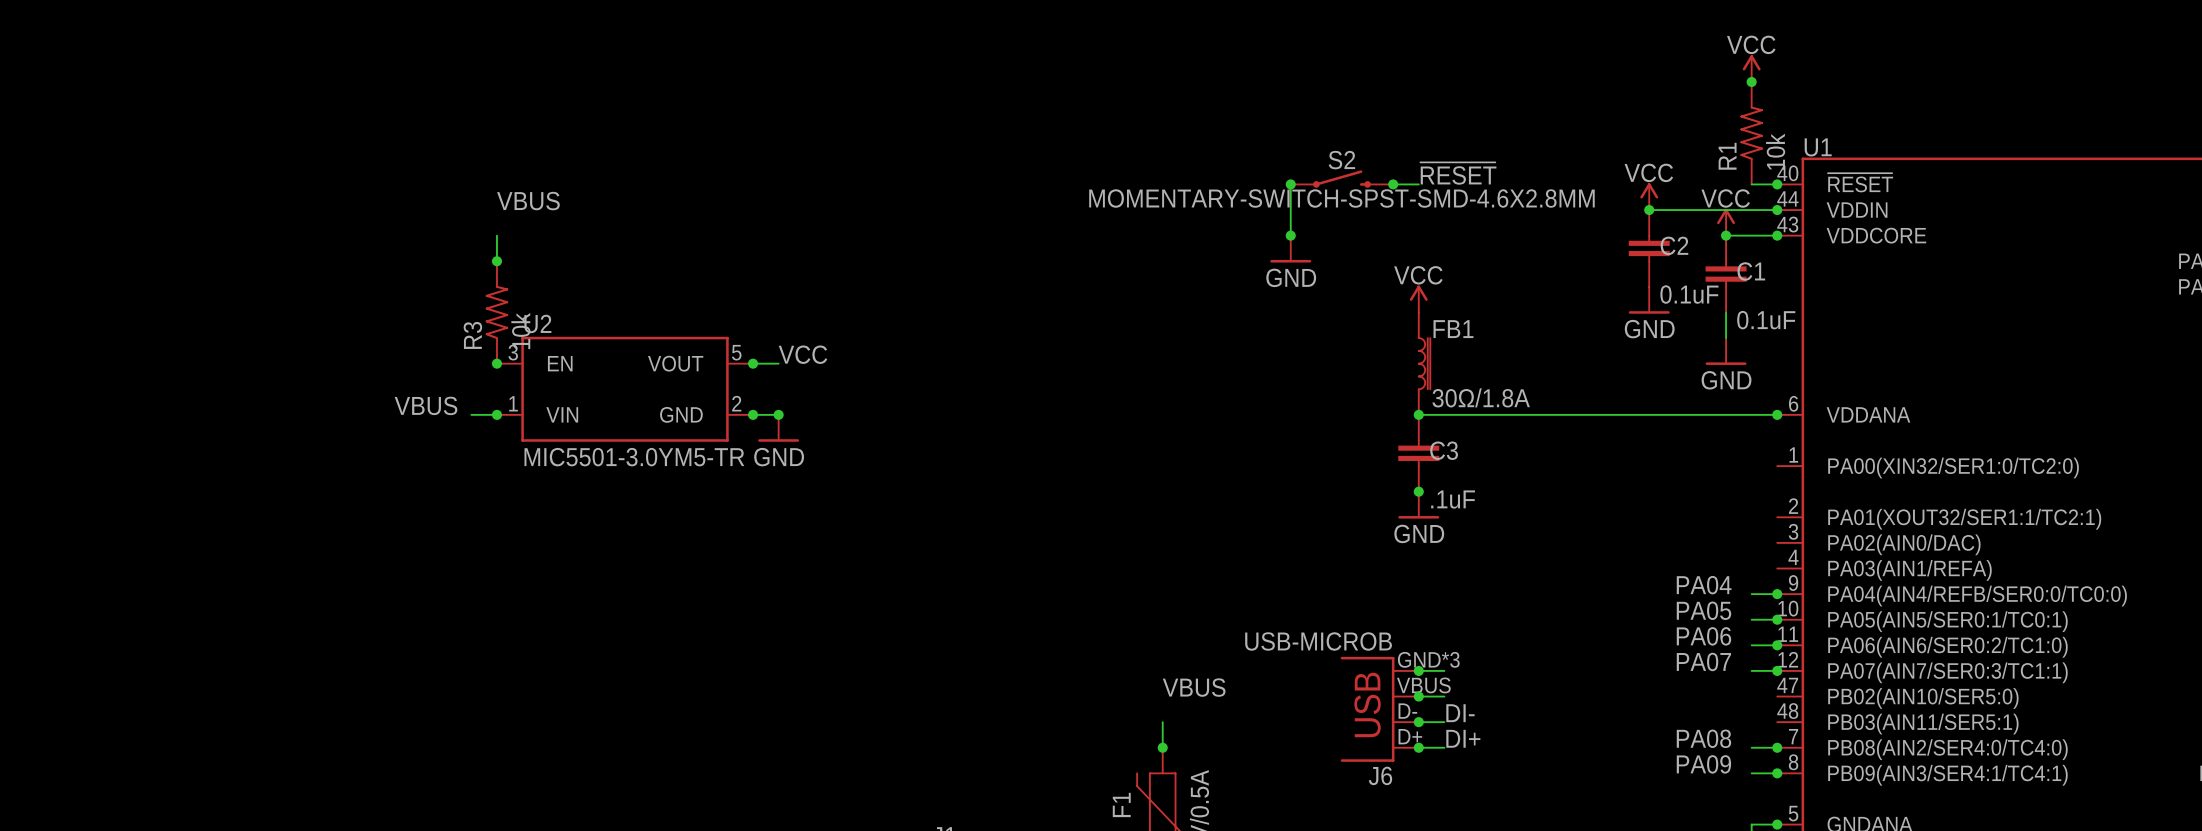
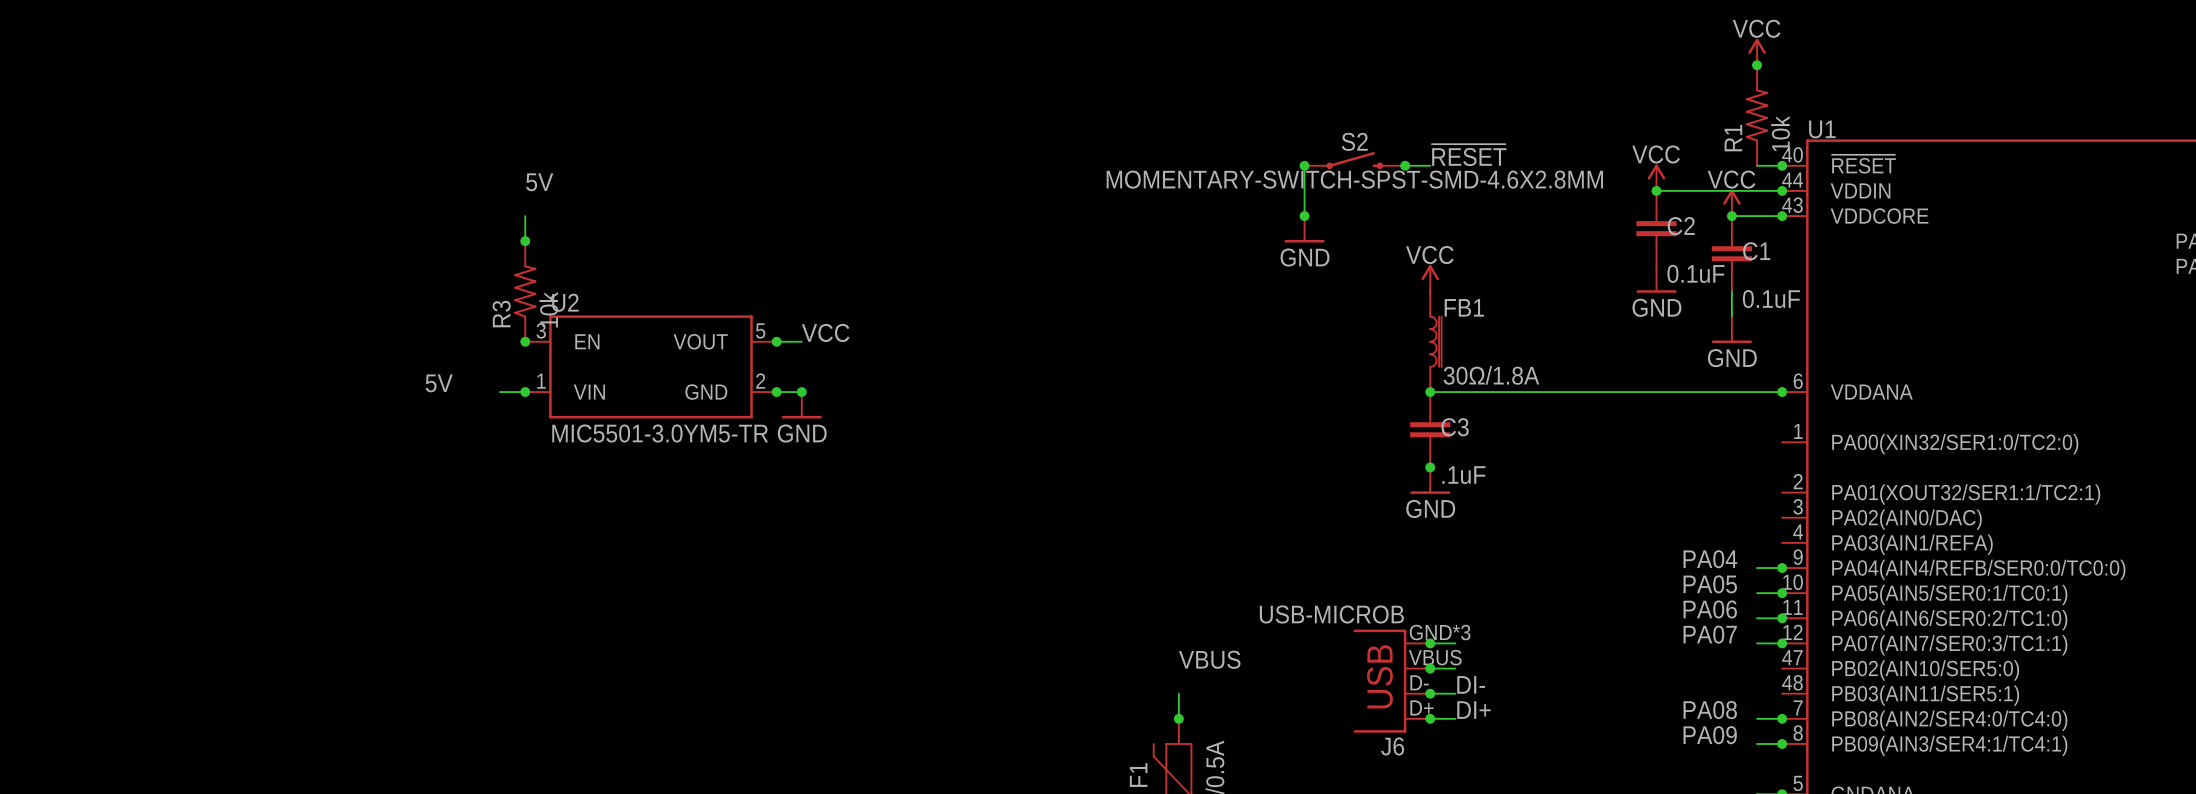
label: VBUS (528, 201) -> 5V (539, 182)
label: VBUS (425, 405) -> 5V (439, 383)

